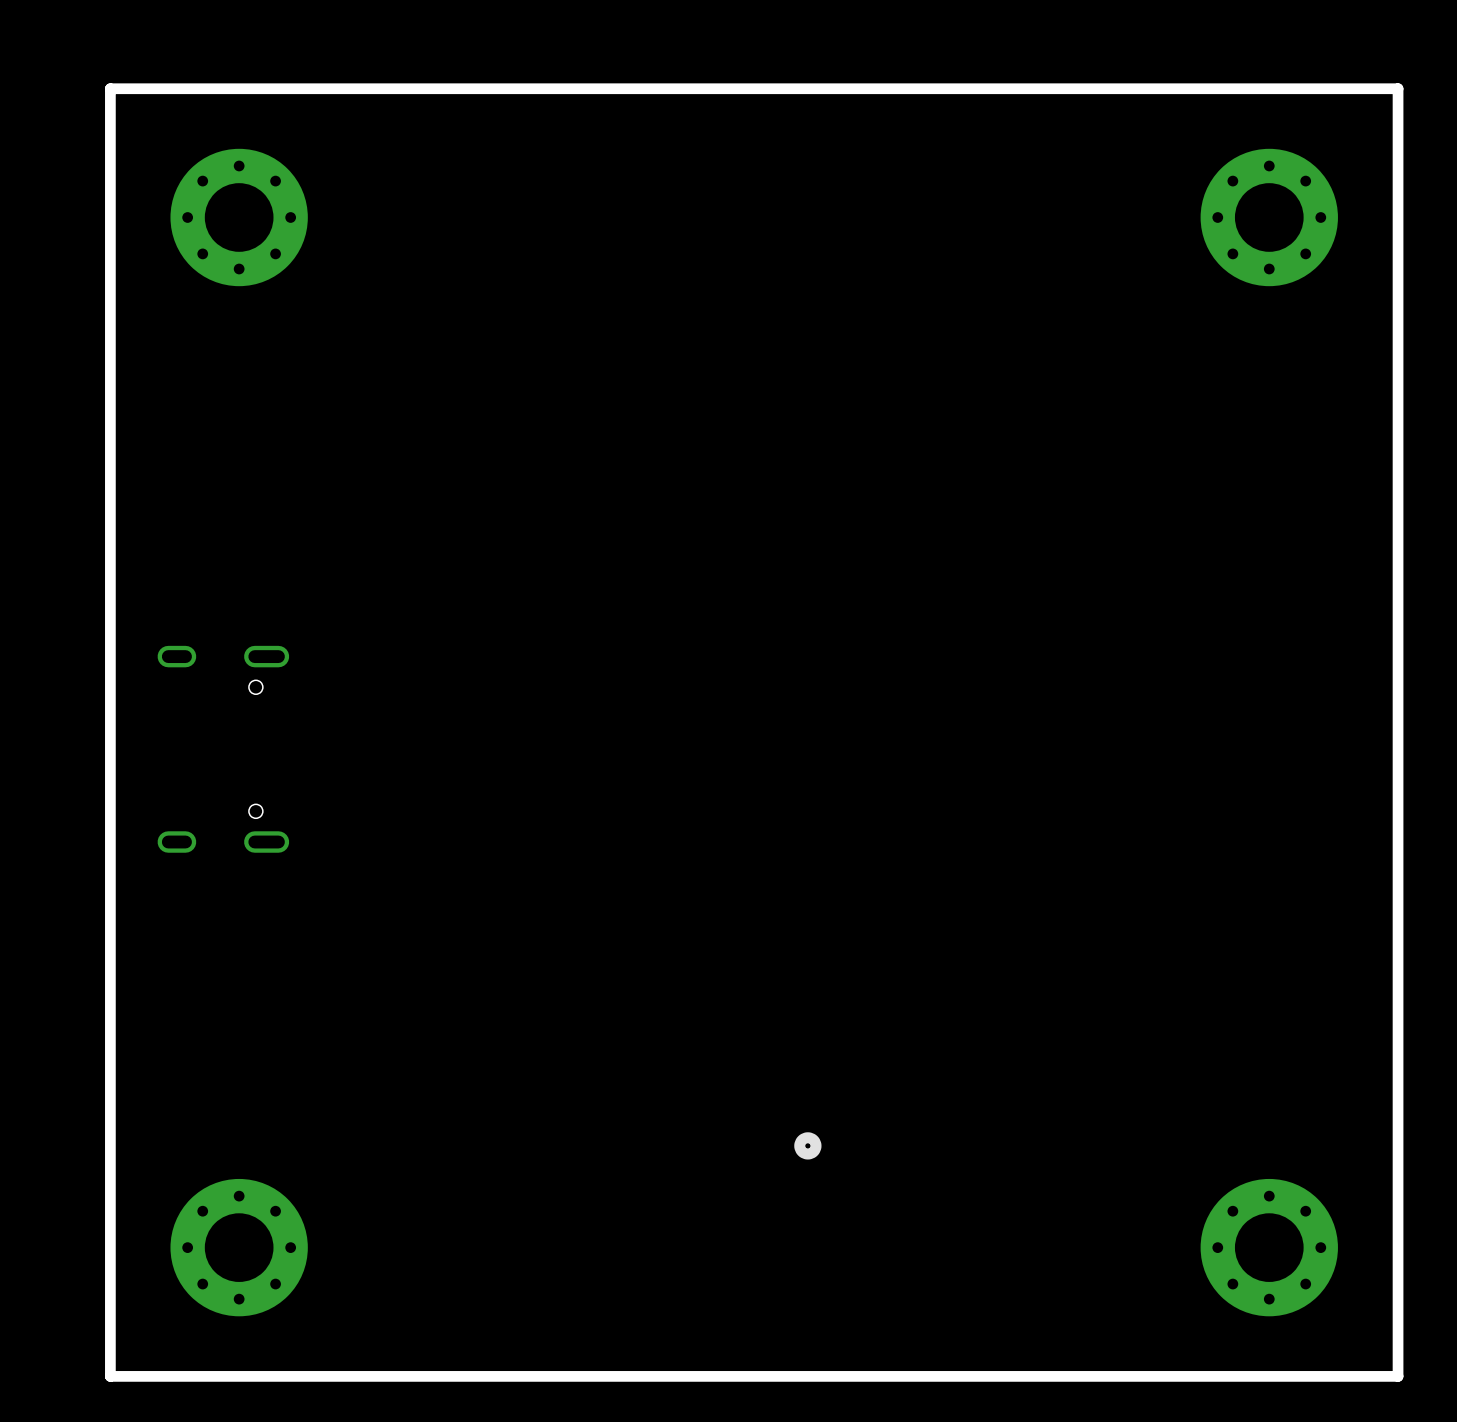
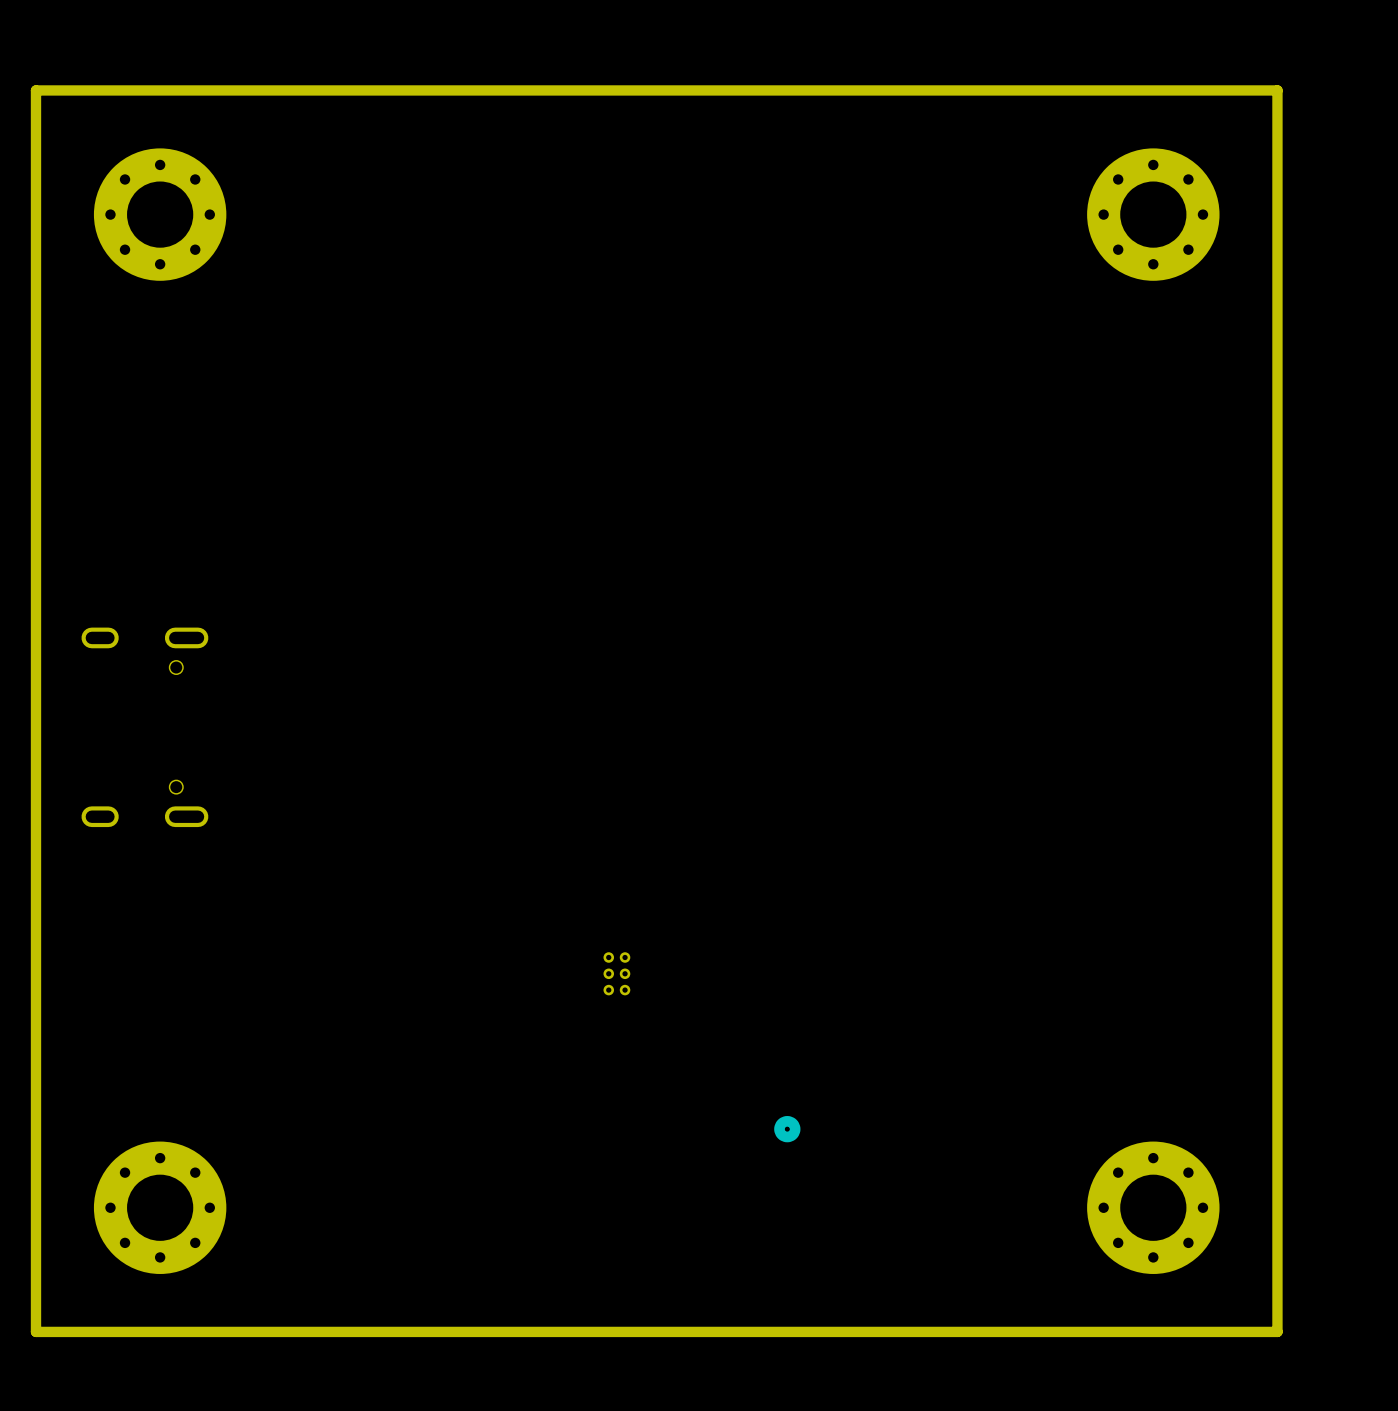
part: none -> (616, 973)
part position: (807, 1145) -> (787, 1129)

